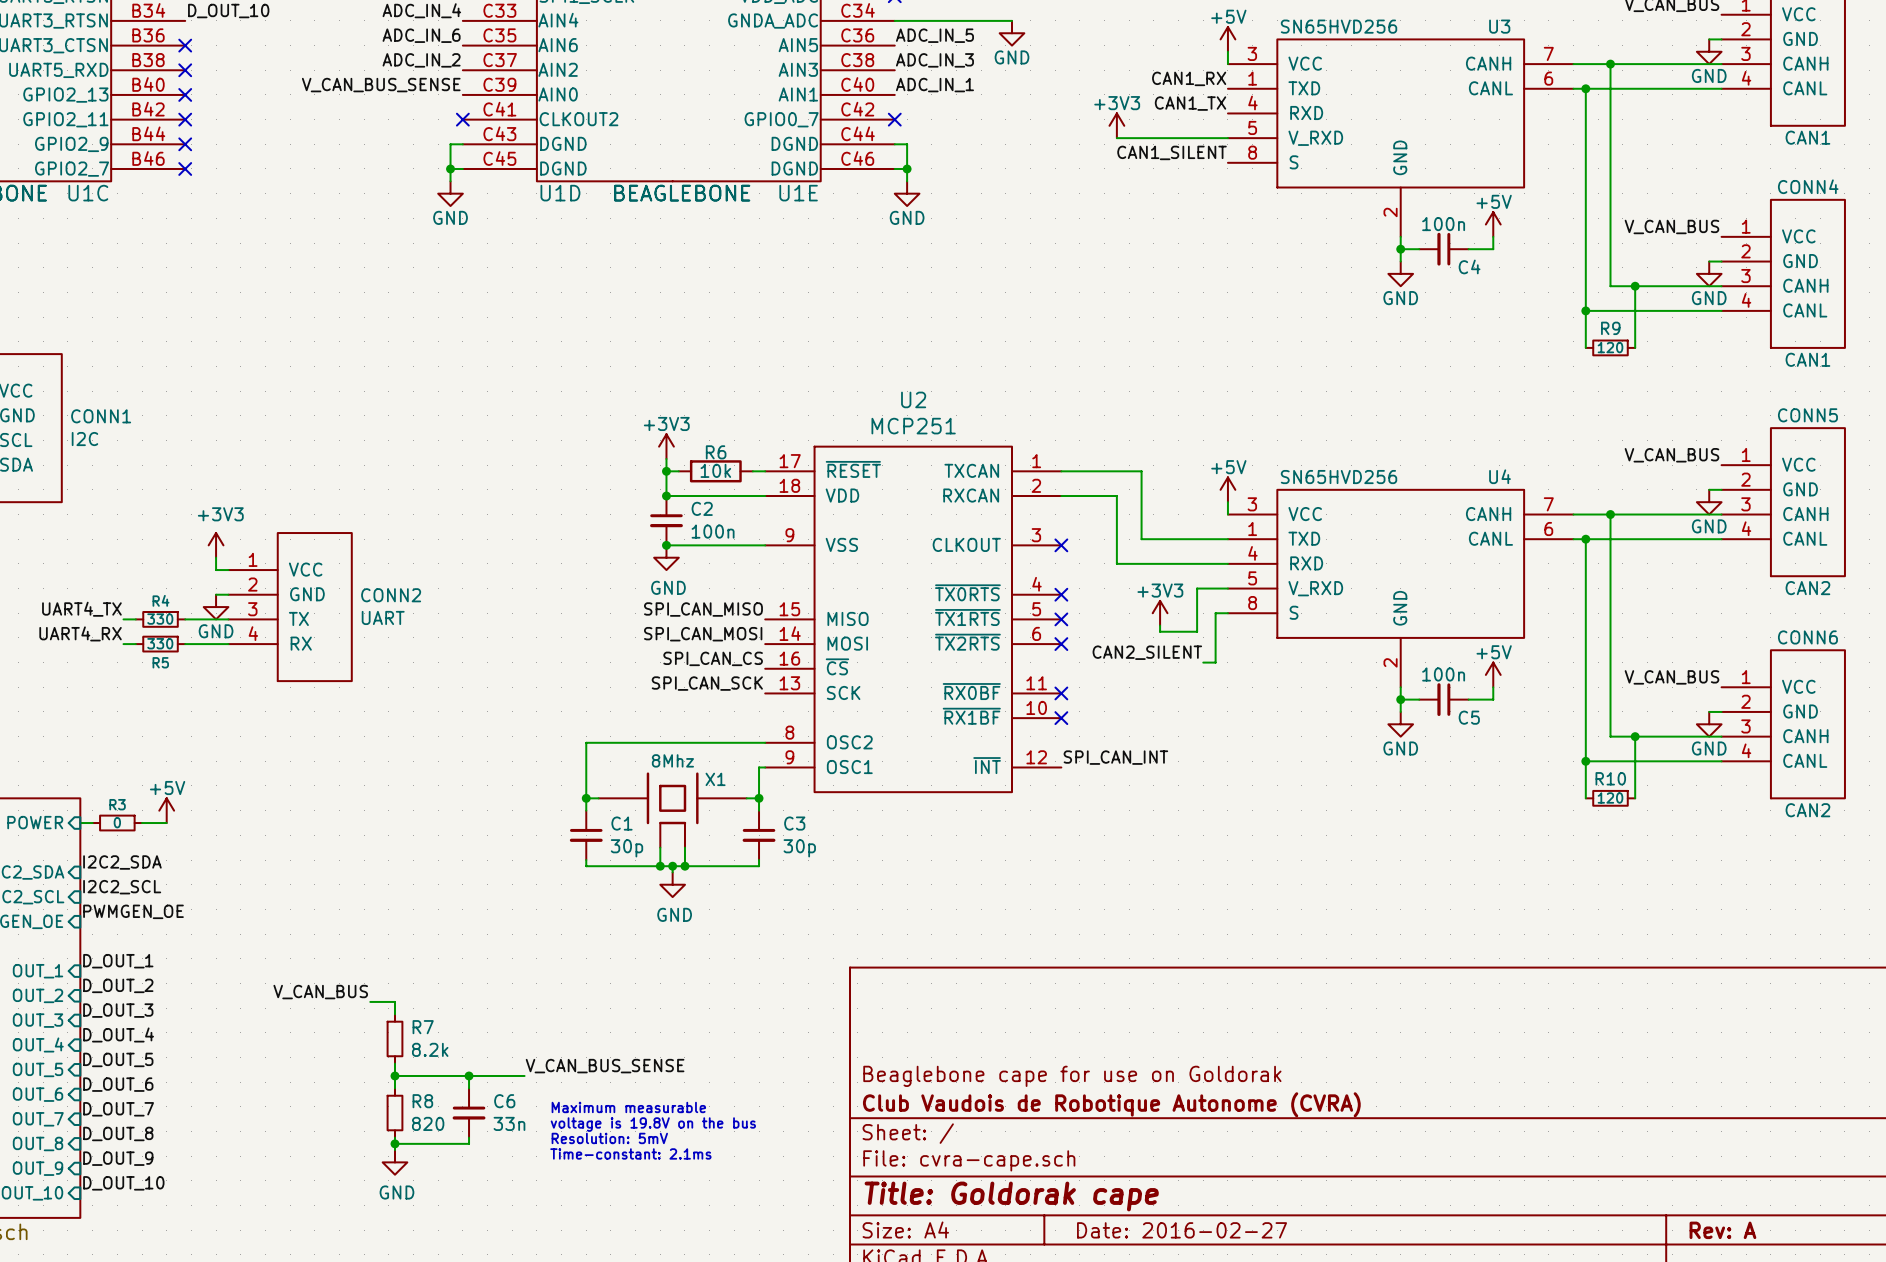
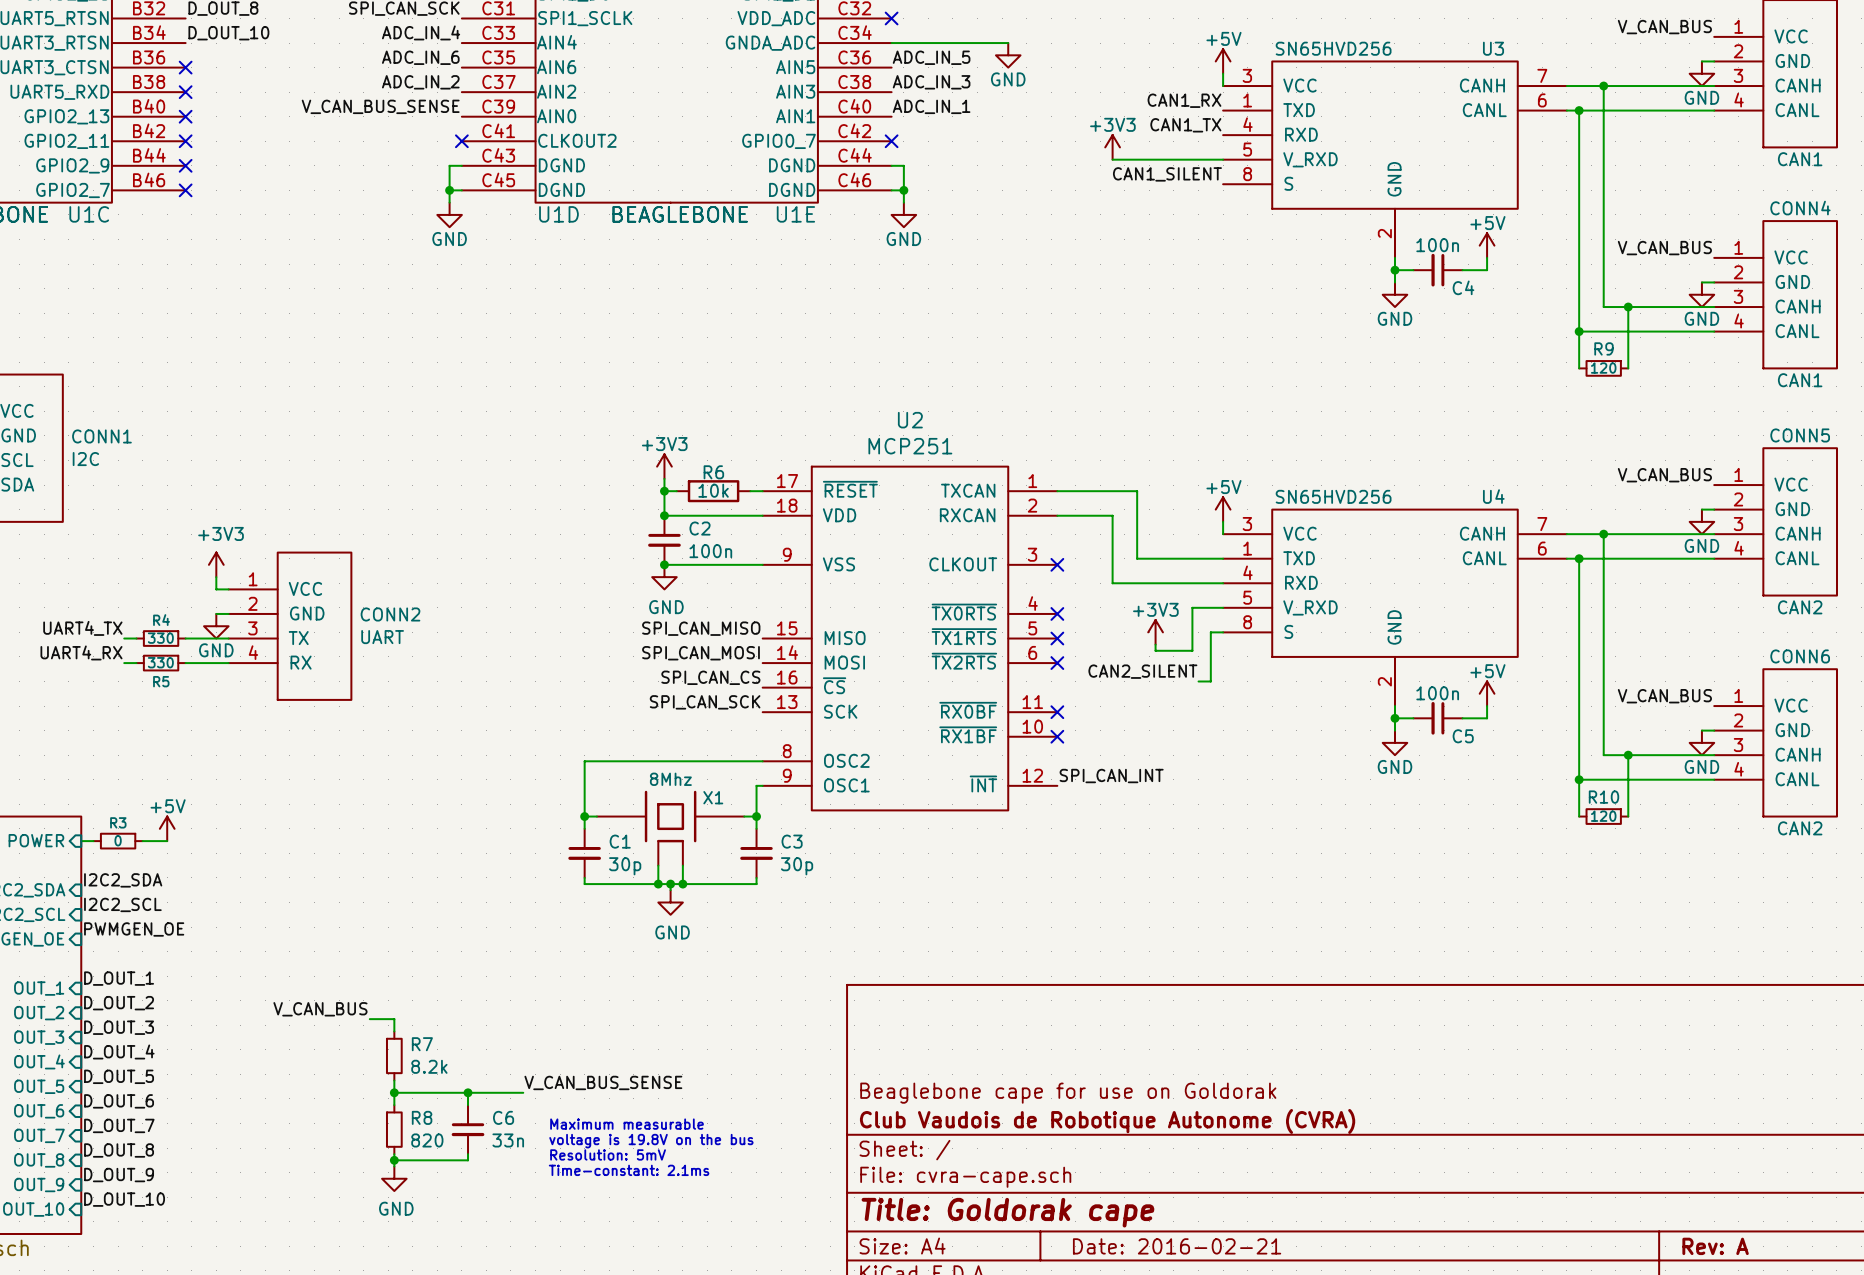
title block: Date: 2016-02-27 (1182, 1230) -> Date: 2016-02-21 (1177, 1246)

